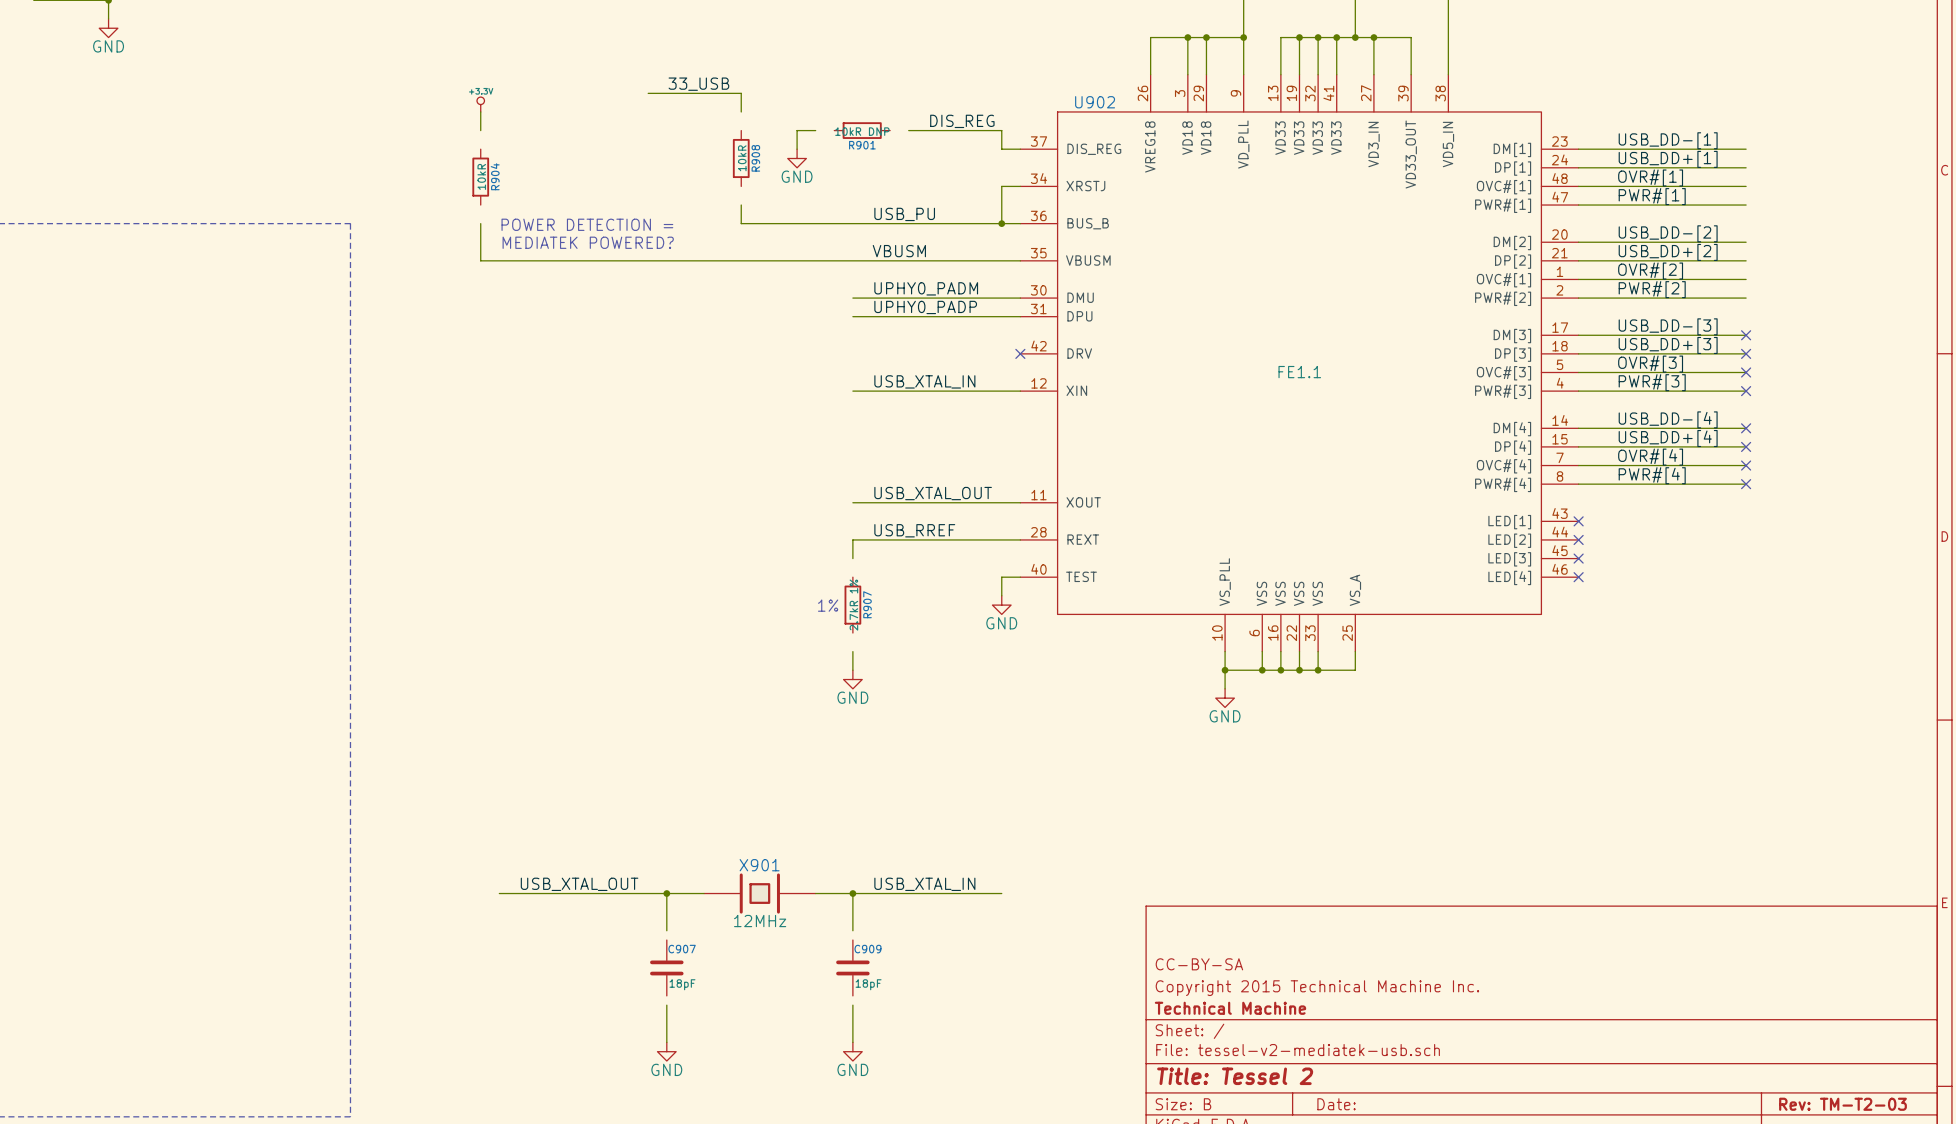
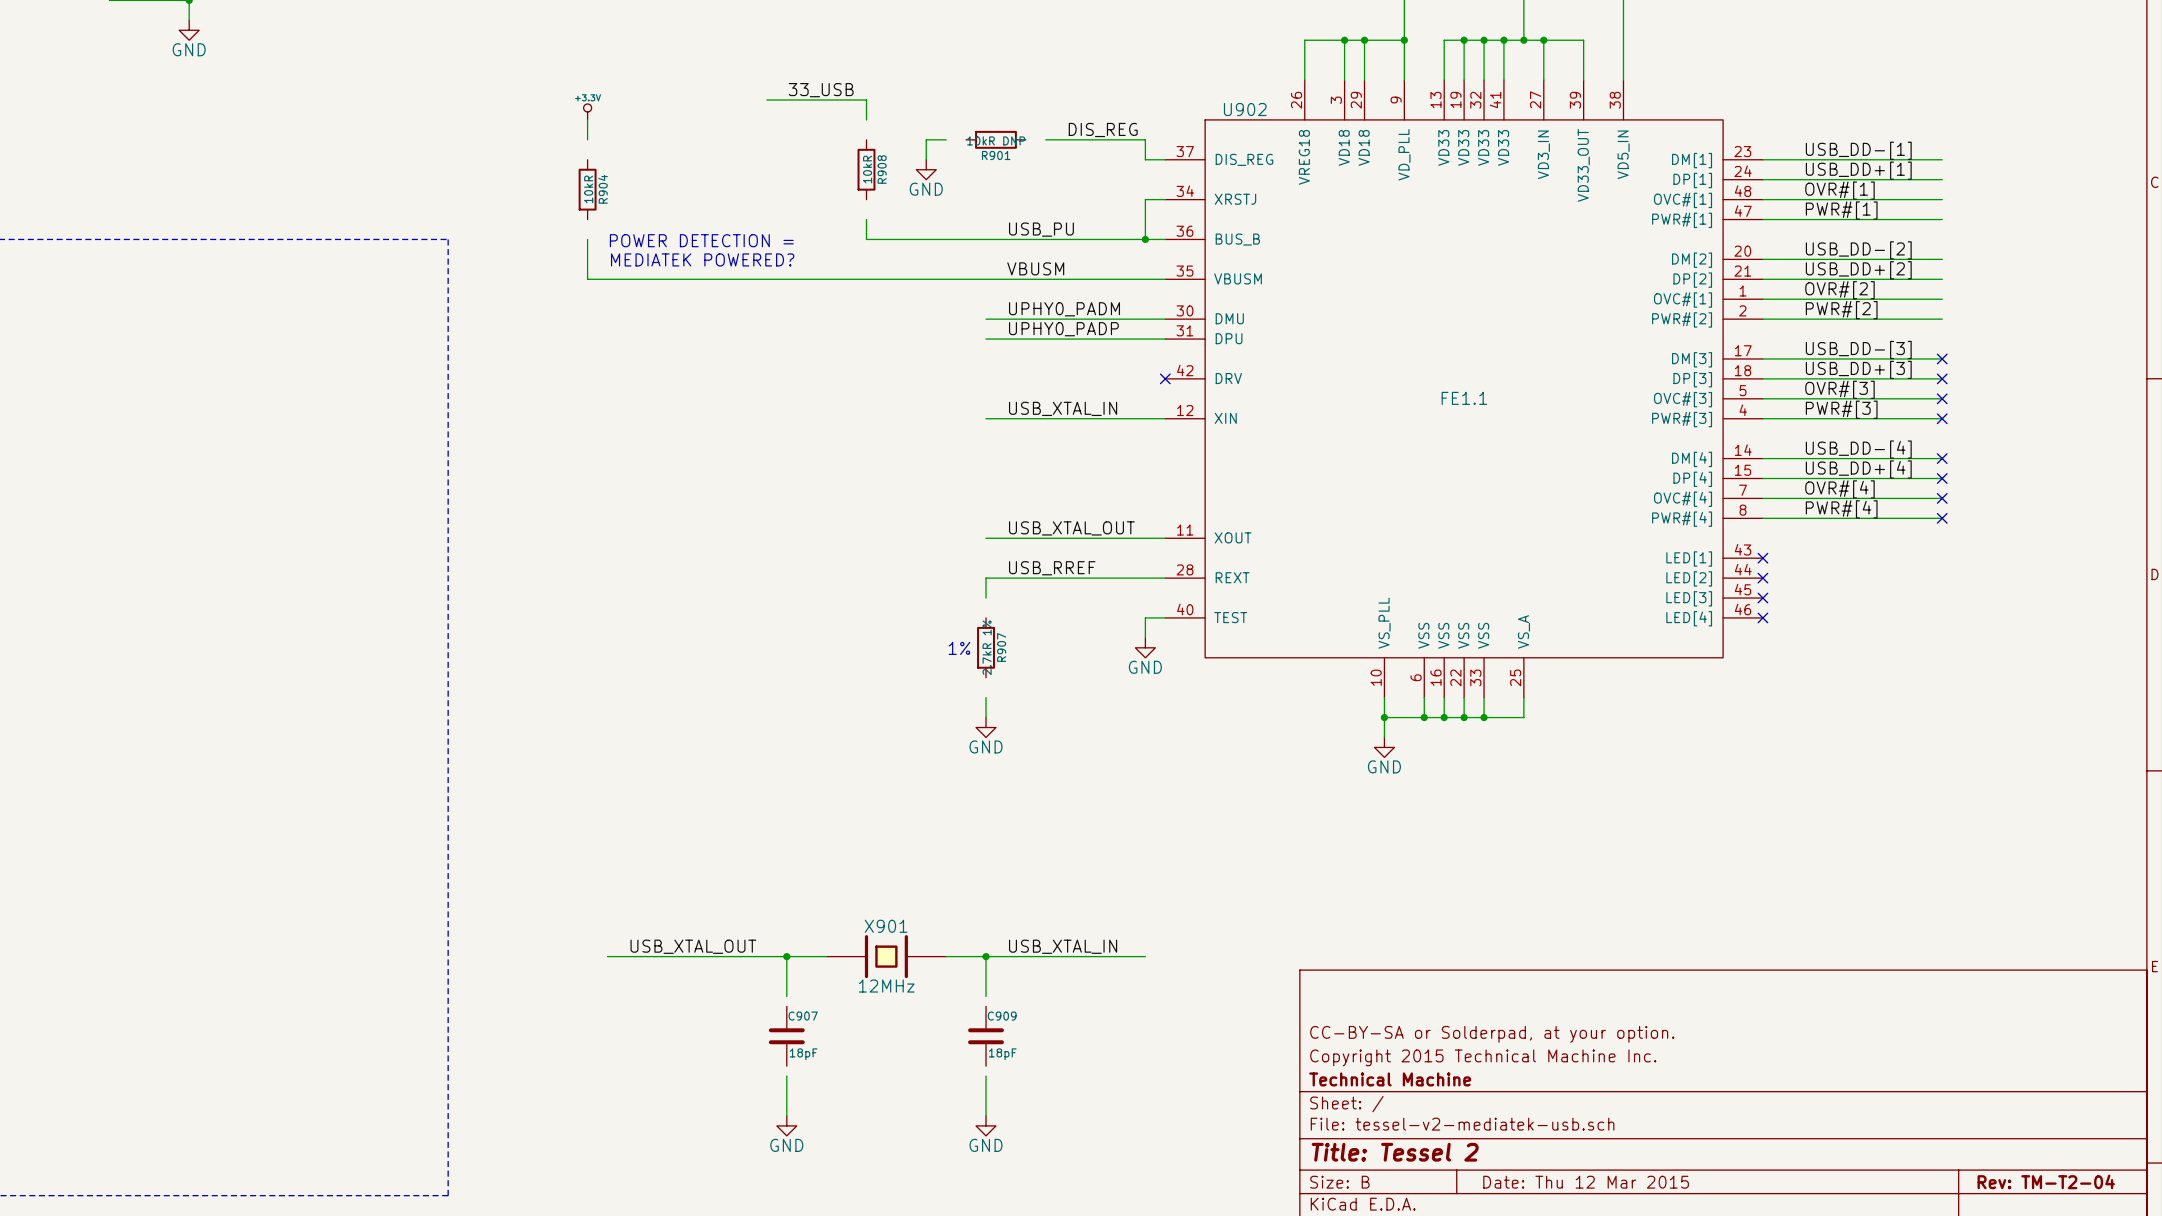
title block: CC-BY-SA (1199, 964) -> CC-BY-SA or Solderpad, at your option. (1492, 1034)
title block: Date: (1336, 1104) -> Date: Thu 12 Mar 2015 (1586, 1182)
title block: Rev: TM-T2-03 (1842, 1104) -> Rev: TM-T2-04 (2046, 1181)

